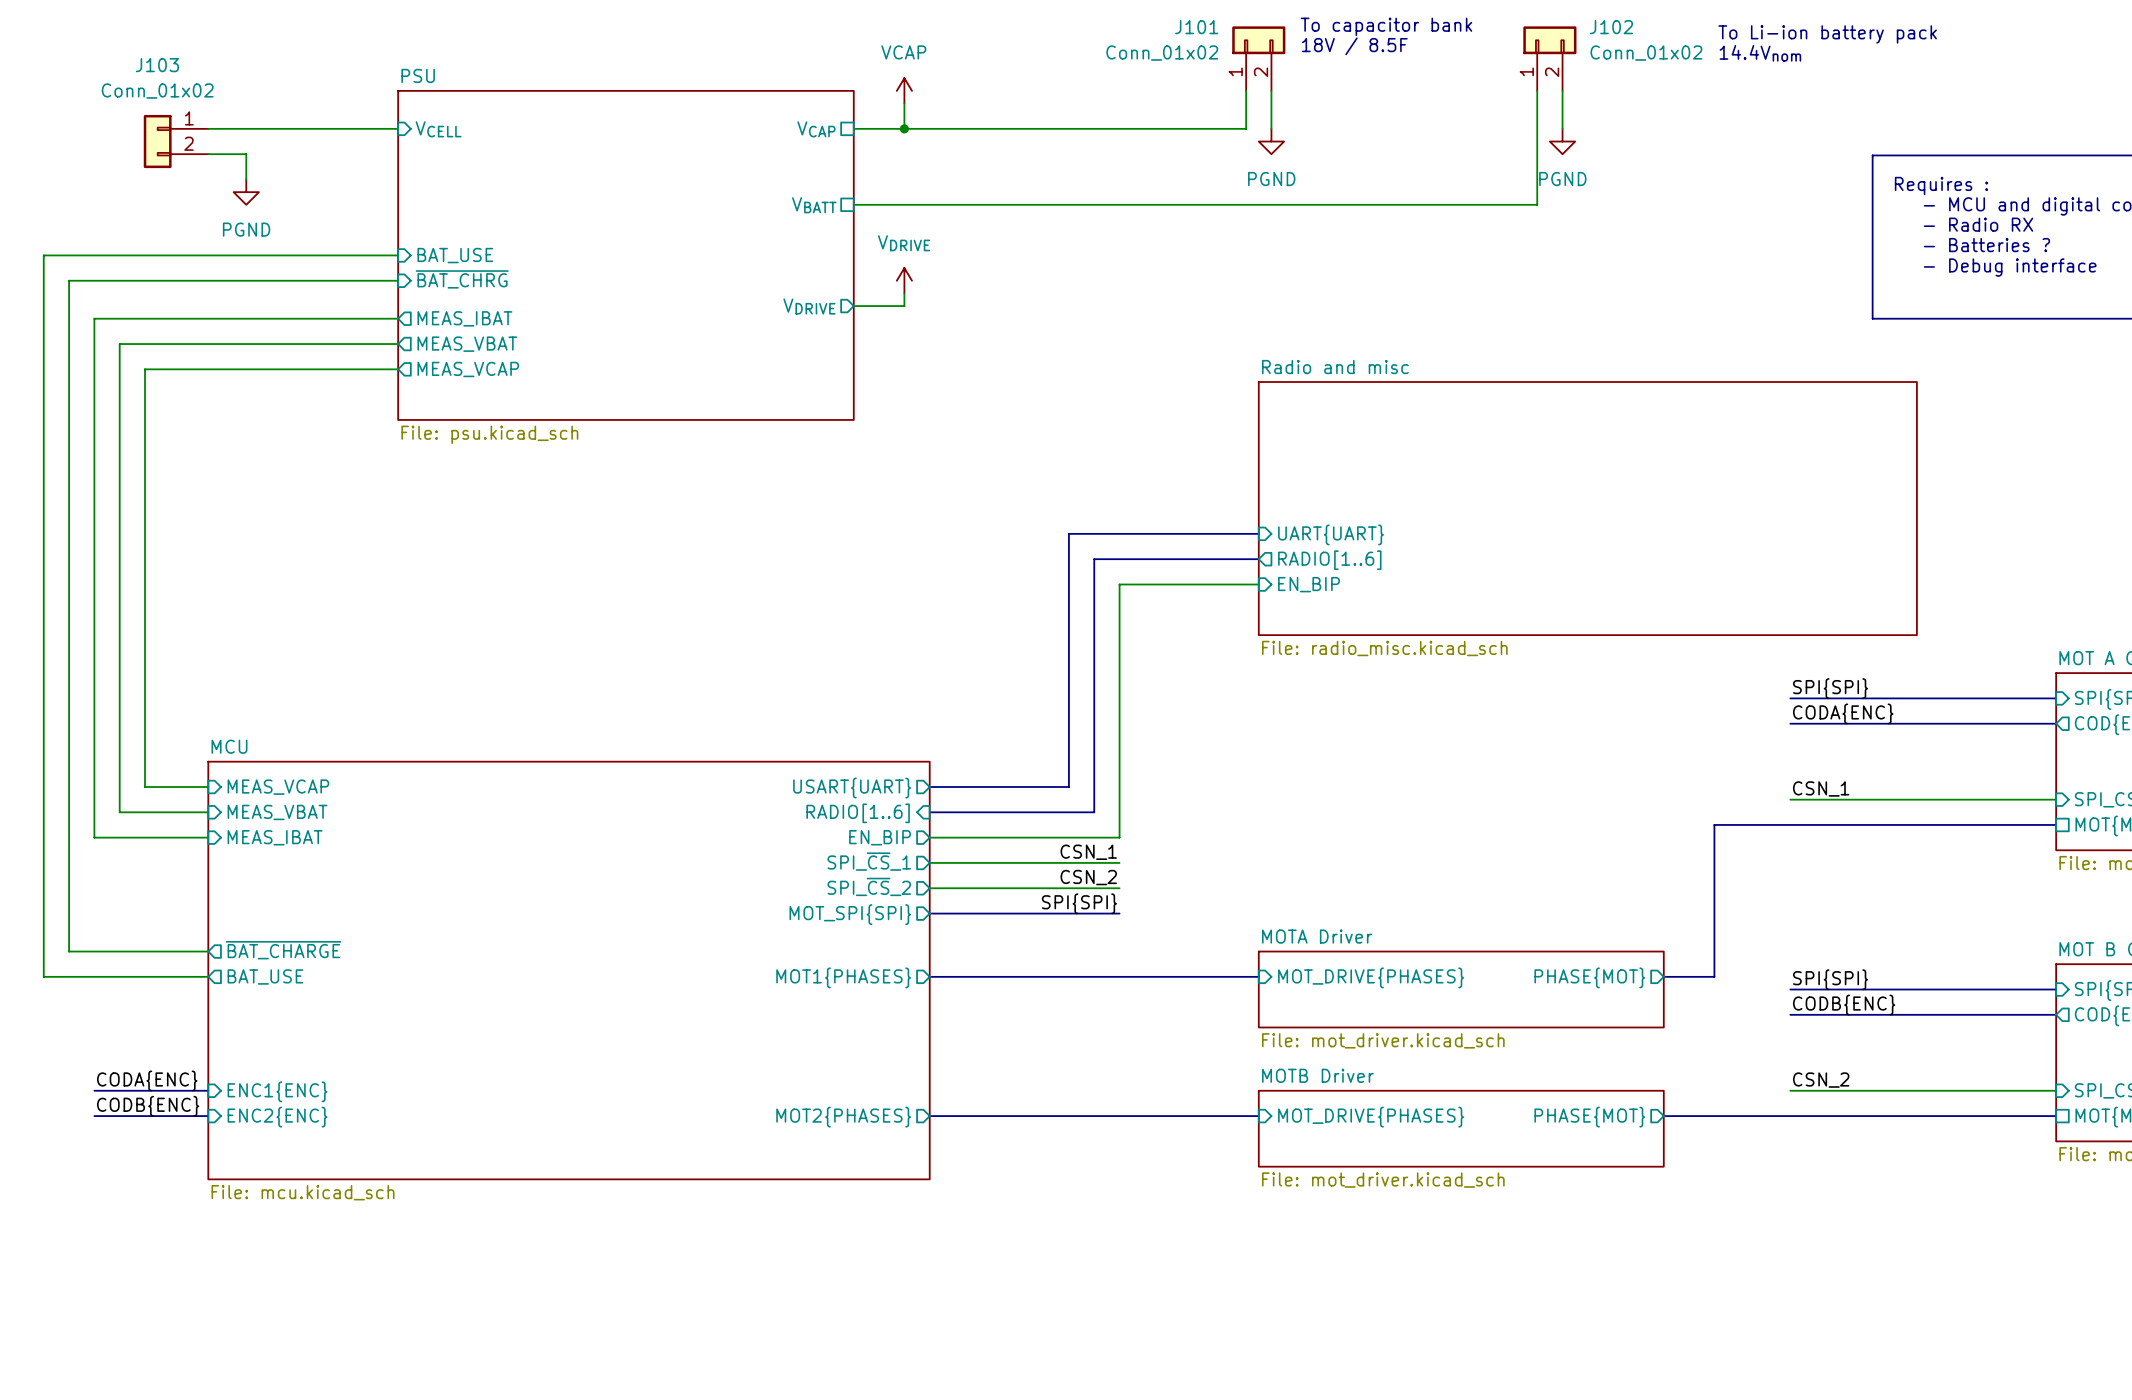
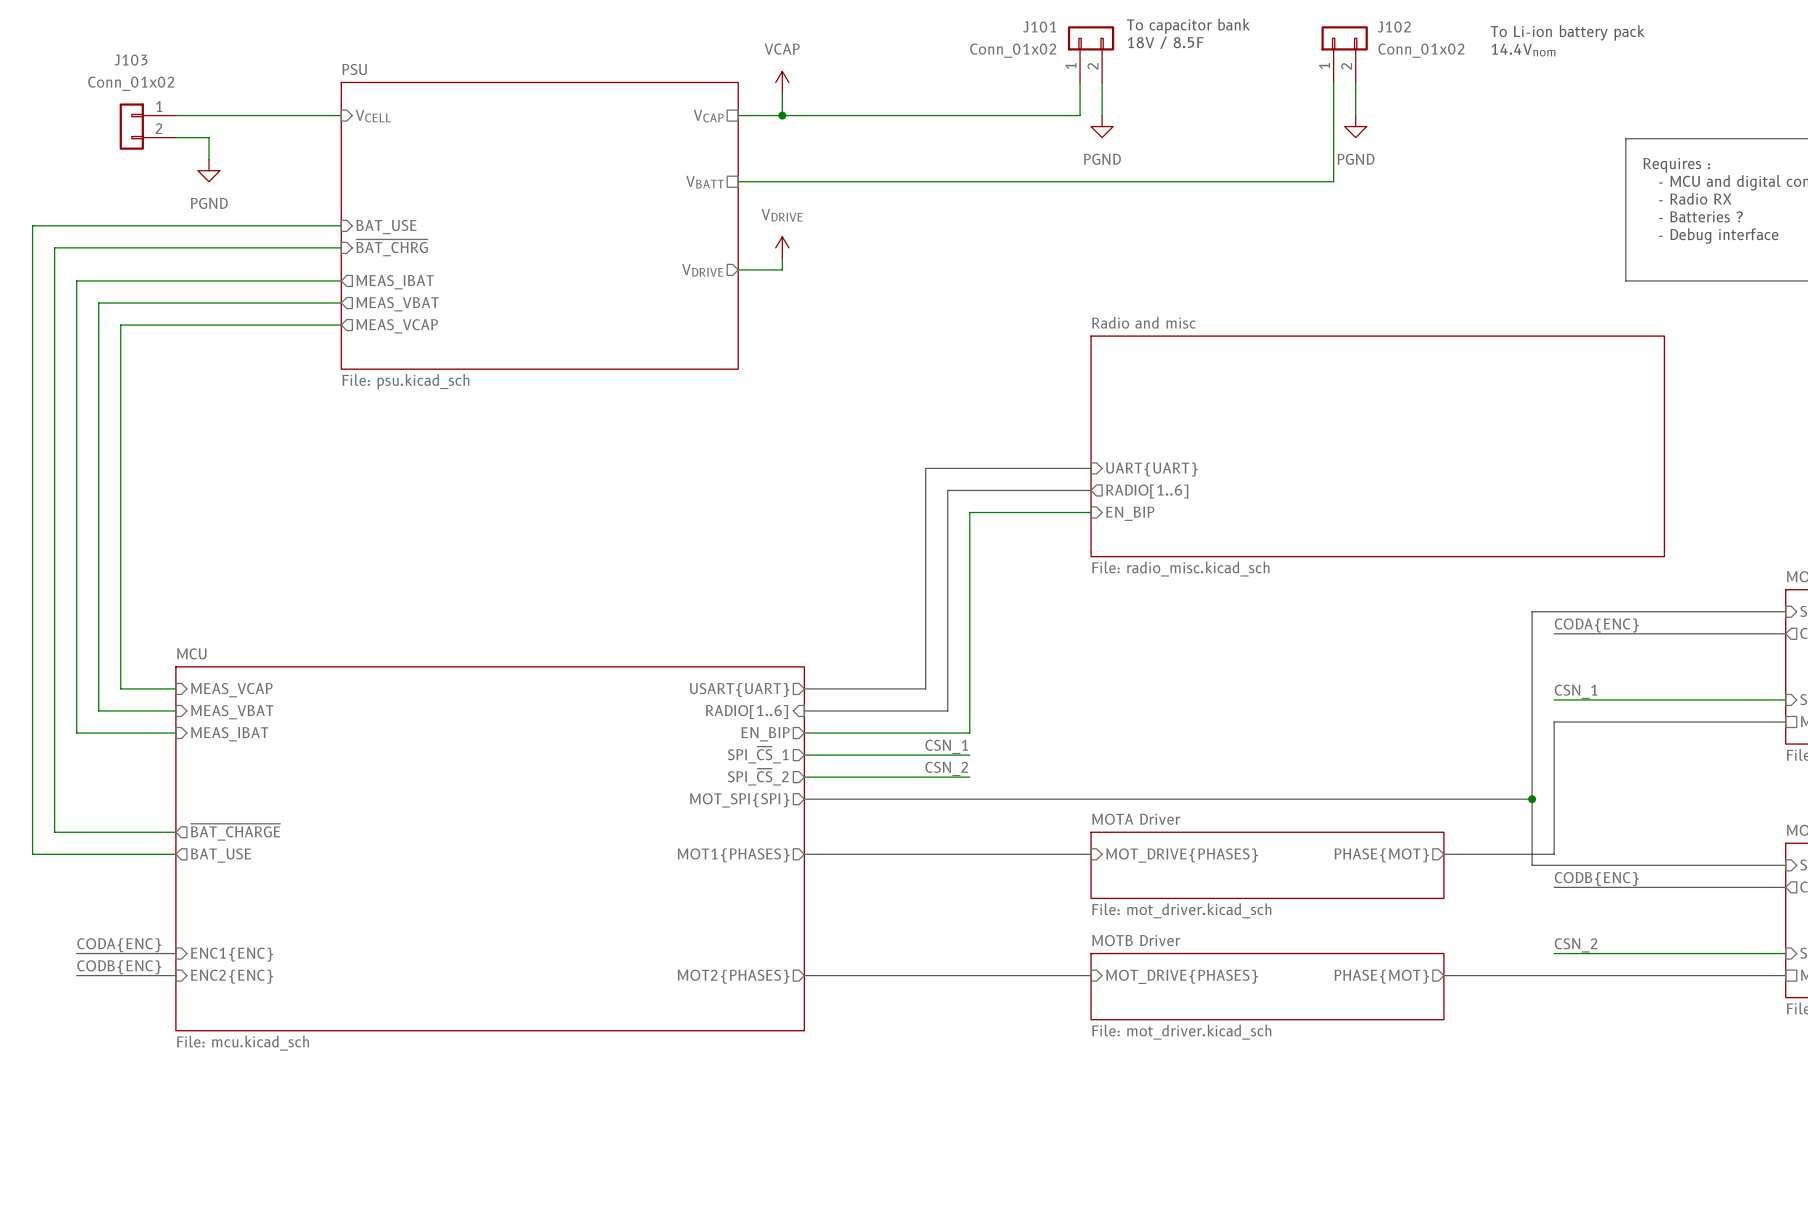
label: SPI{SPI} (1830, 688) -> none
bus: none -> (1554, 611) (1532, 611) (1532, 865) (1554, 865)
bus: (1790, 824) (1714, 824) (1714, 976) -> (1554, 722) (1554, 854) (1488, 854)
label: SPI{SPI} (1079, 903) -> none
bus: none -> (969, 799) (1532, 799)
junction: none -> (1532, 799)
label: SPI{SPI} (1830, 979) -> none

